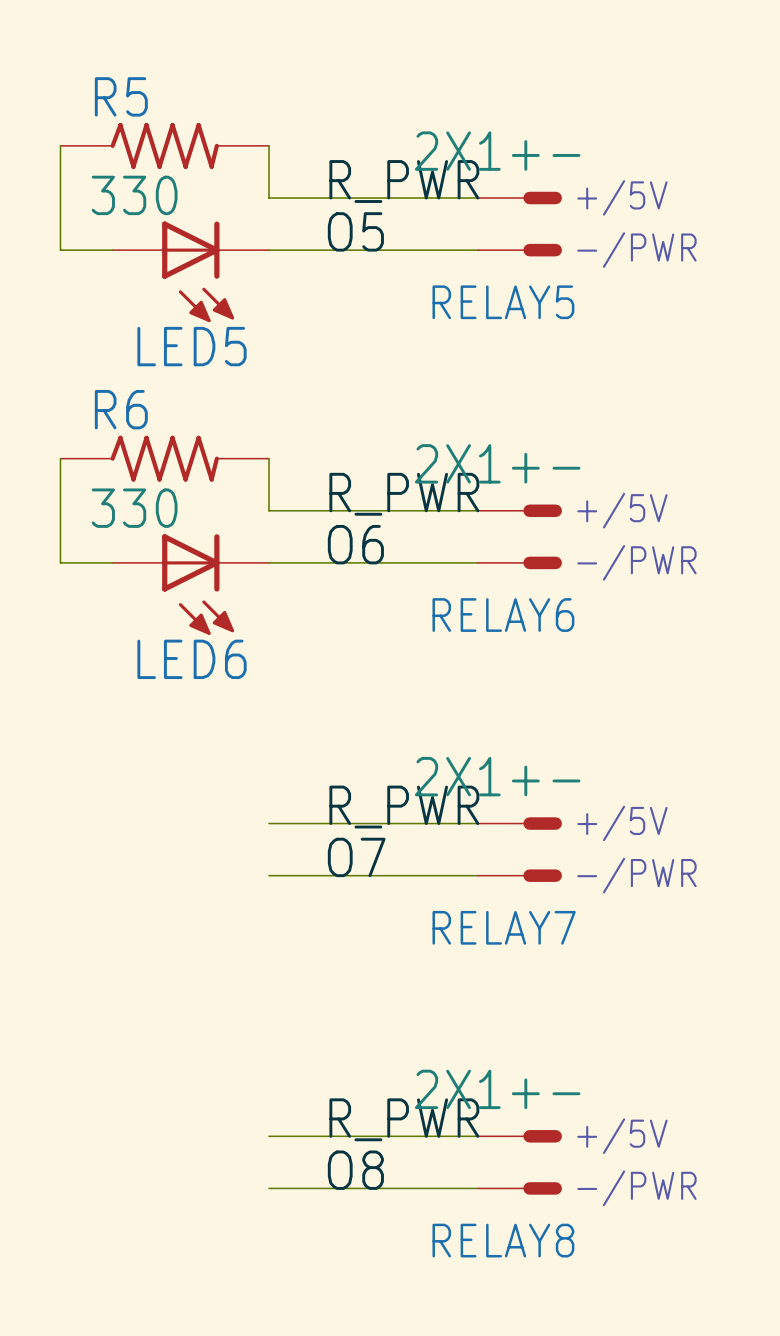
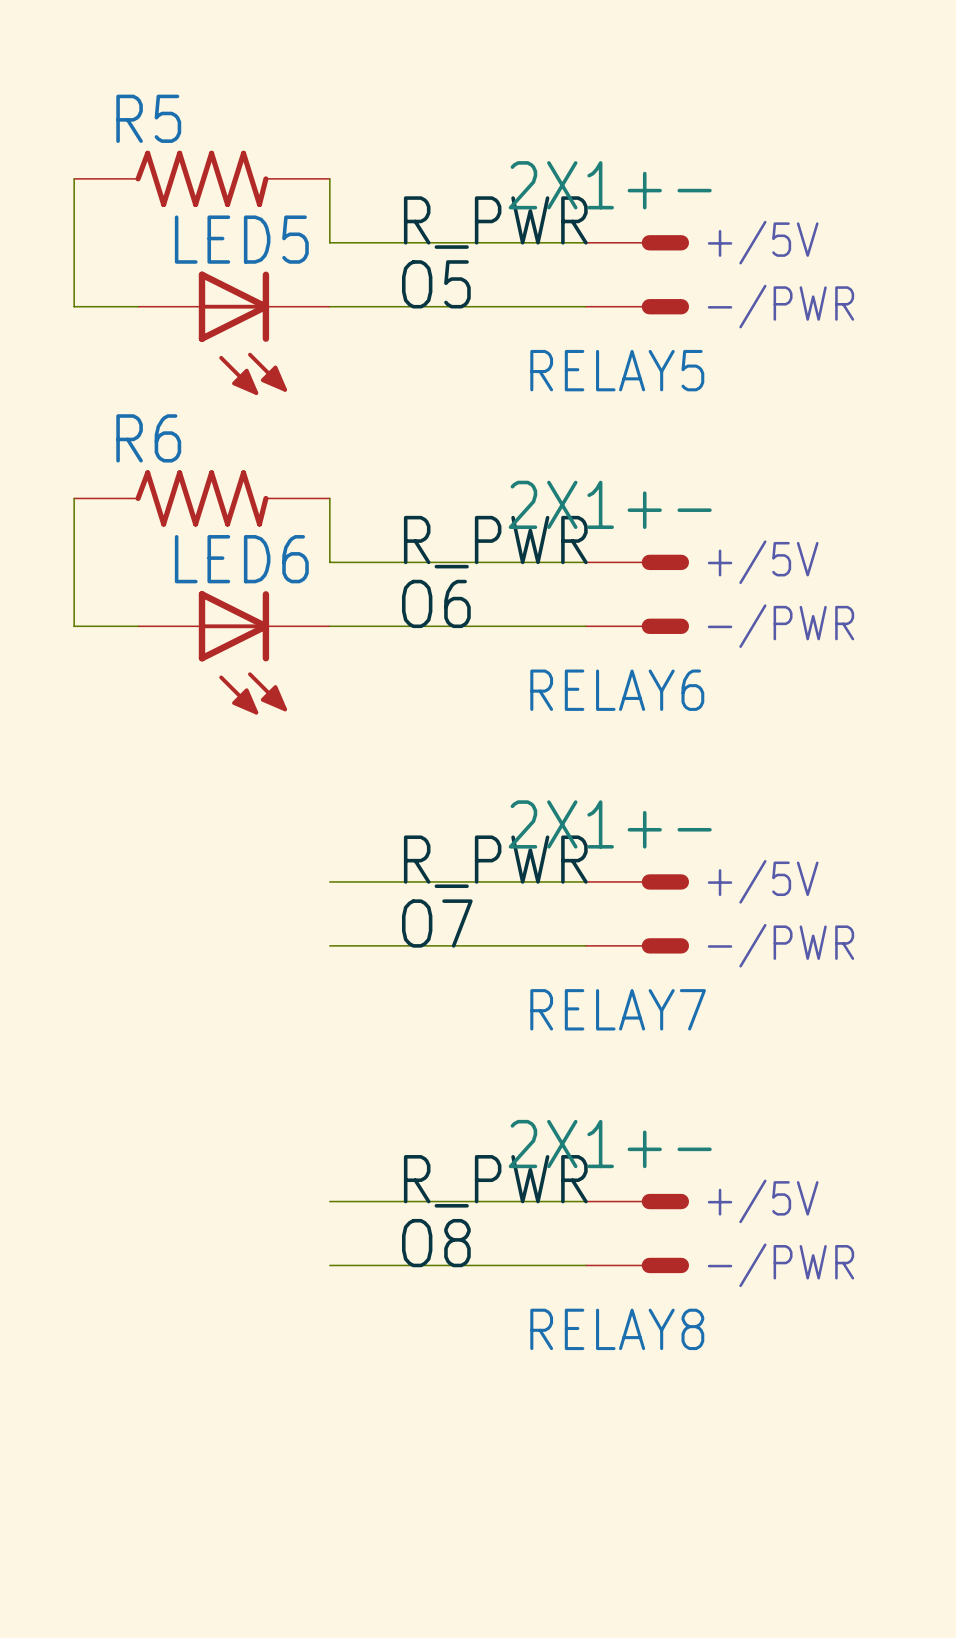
R5 value: 330 (134, 195) -> none
LED5 name position: LED5 (192, 346) -> LED5 (241, 239)
wire: none -> (329, 498) (329, 562) (585, 562)
label: none -> R_PWR (495, 542)
R6 position: (164, 458) -> (201, 498)
wire: (268, 458) (268, 510) -> (74, 498) (74, 562)
label: R_PWR (404, 494) -> O6 (436, 603)
R6 value: 330 (134, 508) -> none
wire: (60, 510) (60, 562) (112, 562) -> (74, 626) (138, 626)
RELAY6 position: (519, 536) -> (637, 594)
label: O6 (355, 544) -> none
wire: (268, 562) (477, 562) -> none
LED6 position: (190, 584) -> (233, 652)
LED6 name position: LED6 (192, 659) -> LED6 (241, 559)
label: none -> R_PWR (495, 861)
label: R_PWR (404, 807) -> none
wire: (268, 823) (477, 823) -> (329, 881) (585, 881)
RELAY7 position: (519, 849) -> (637, 913)
label position: O7 (356, 857) -> O7 (437, 923)
wire: (268, 875) (477, 875) -> (329, 945) (585, 945)
label: none -> R_PWR (495, 1181)
label: R_PWR (404, 1119) -> none
wire: (268, 1136) (477, 1136) -> (329, 1265) (585, 1265)
RELAY8 position: (519, 1162) -> (637, 1233)
label position: O8 (355, 1170) -> O8 (436, 1243)
wire: (268, 1188) (477, 1188) -> (329, 1201) (585, 1201)

